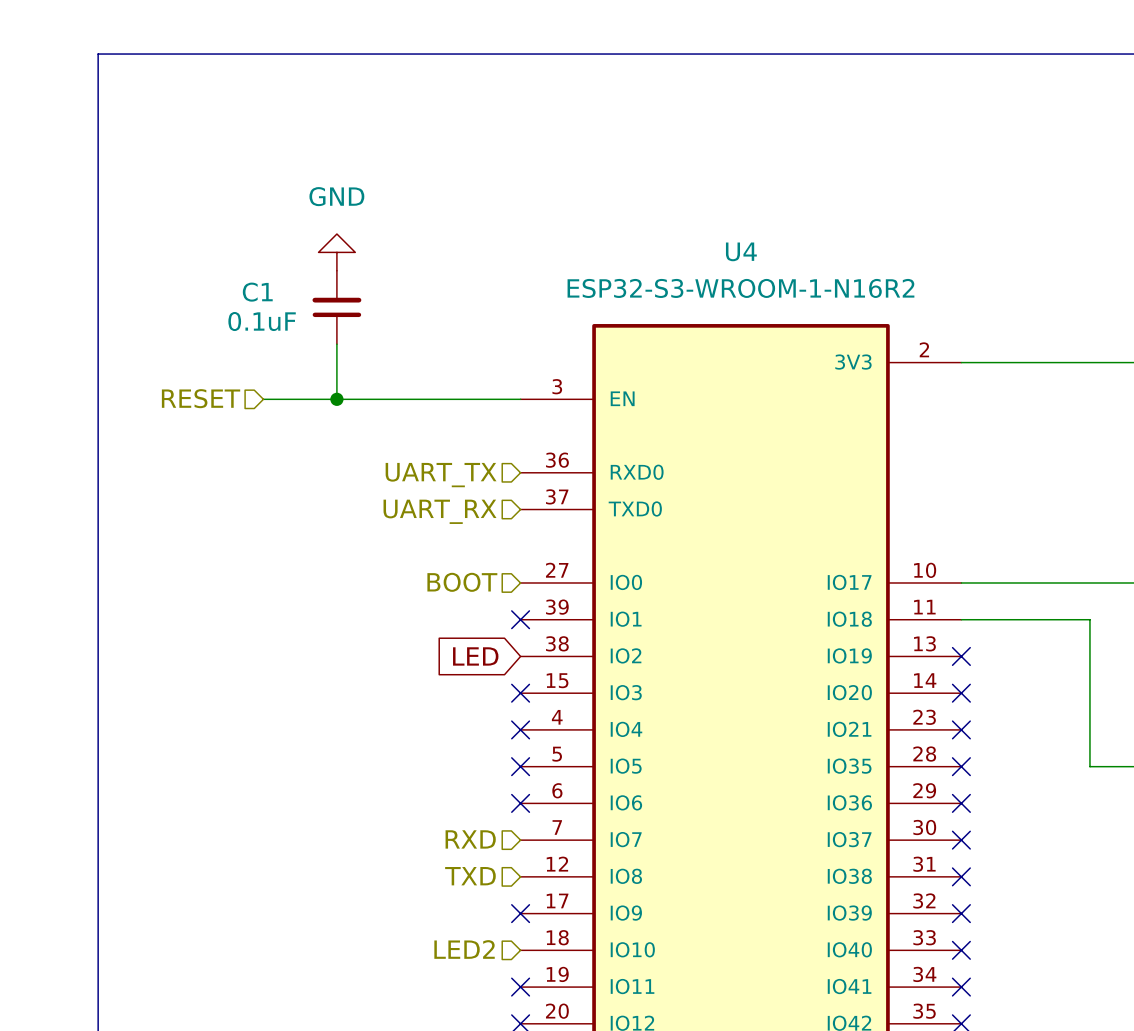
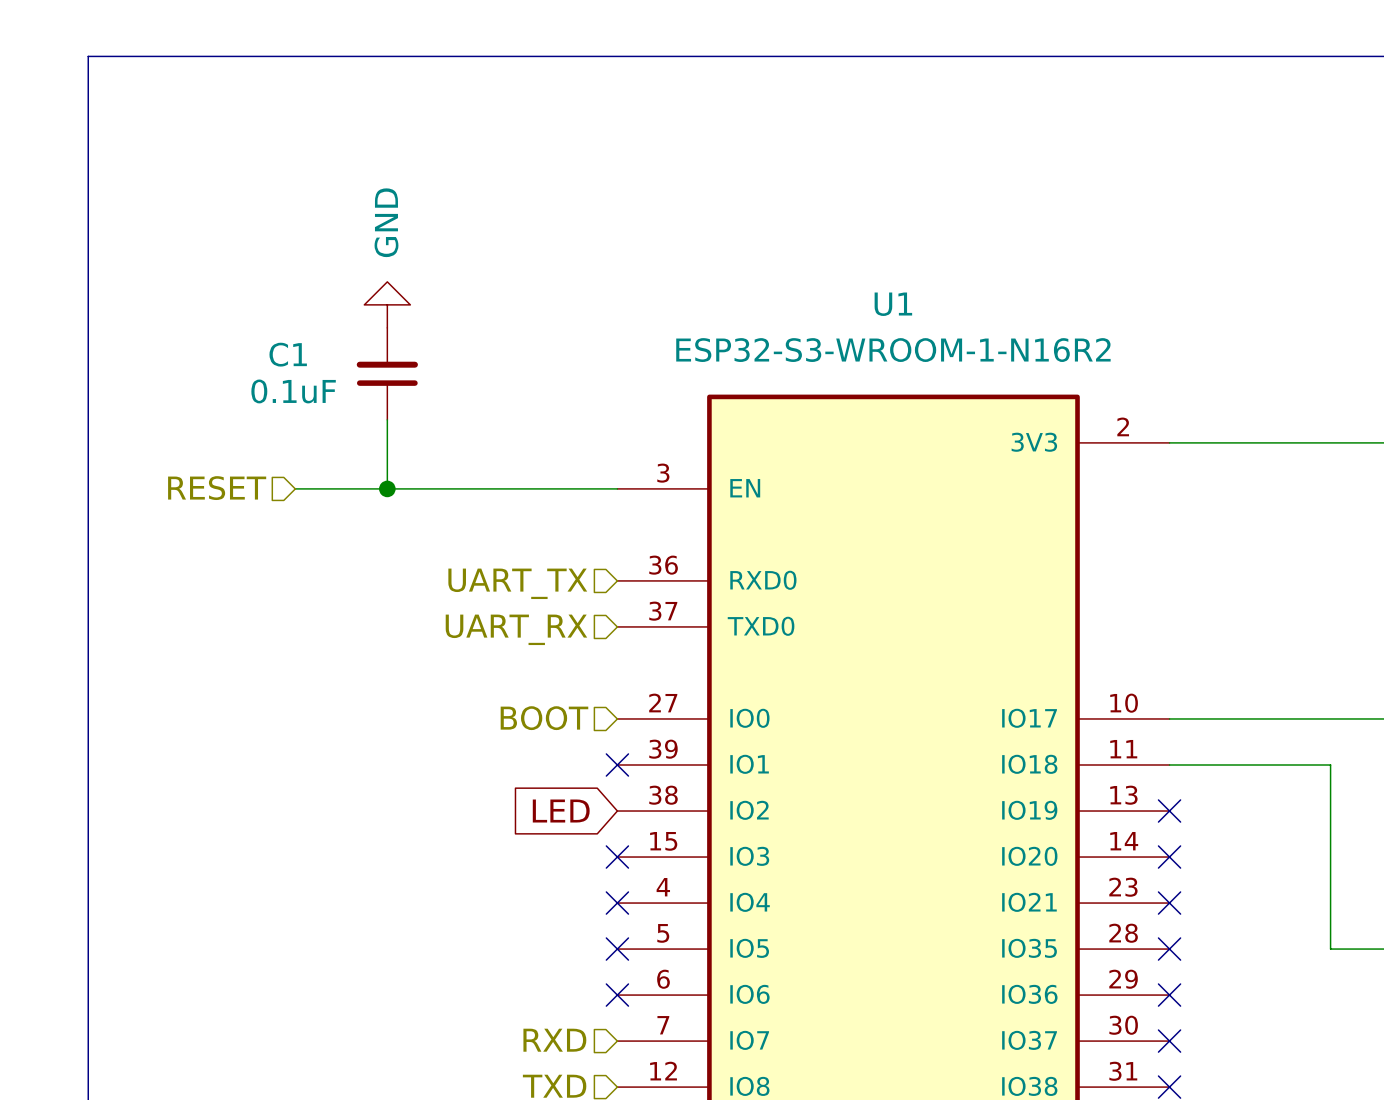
power symbol text rotation: 0° (336, 196) -> 90° counterclockwise (386, 222)
U4 name: U4 (741, 251) -> U1 (893, 304)

